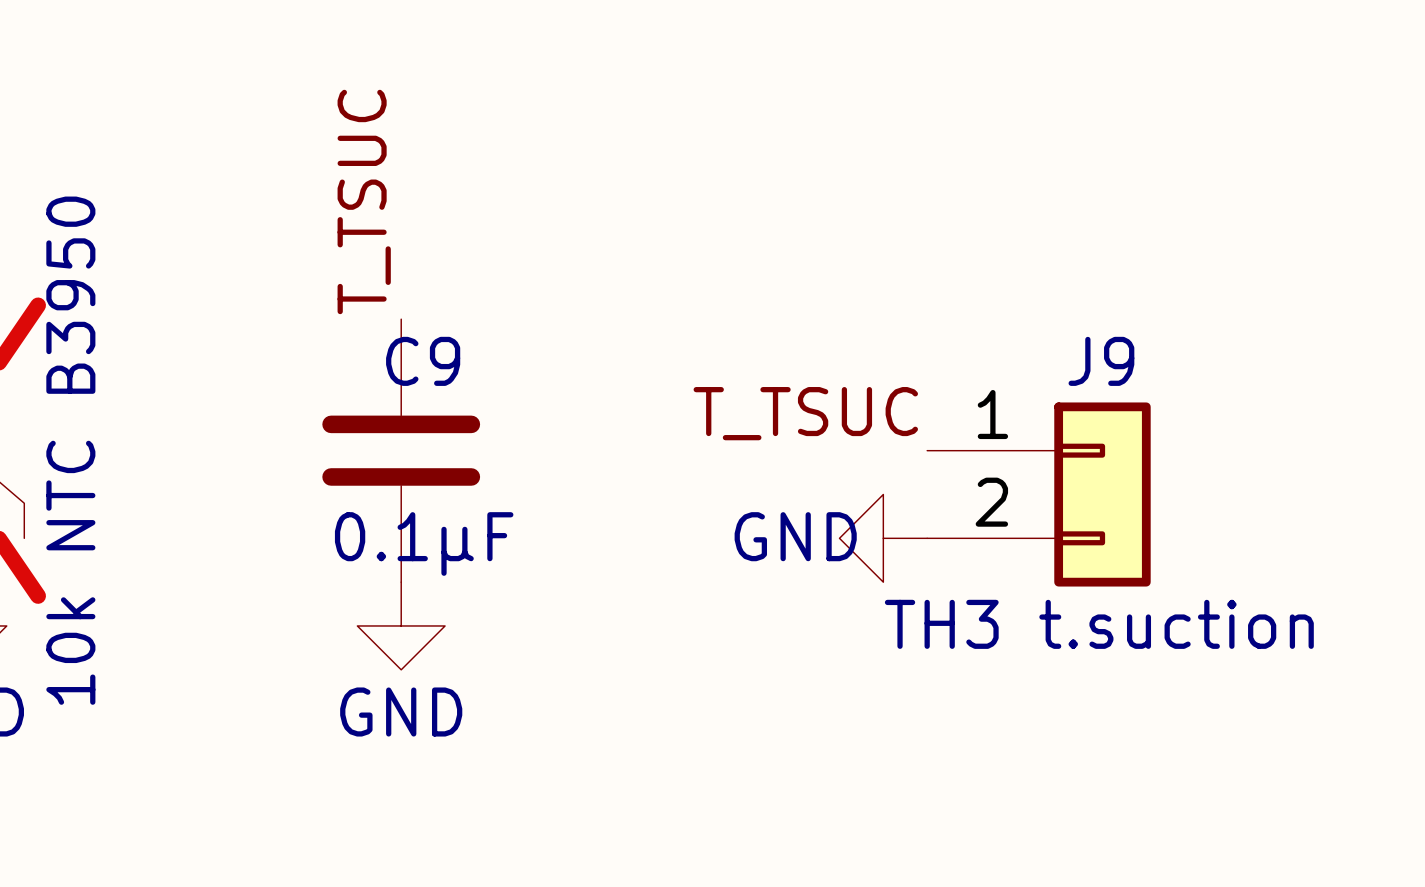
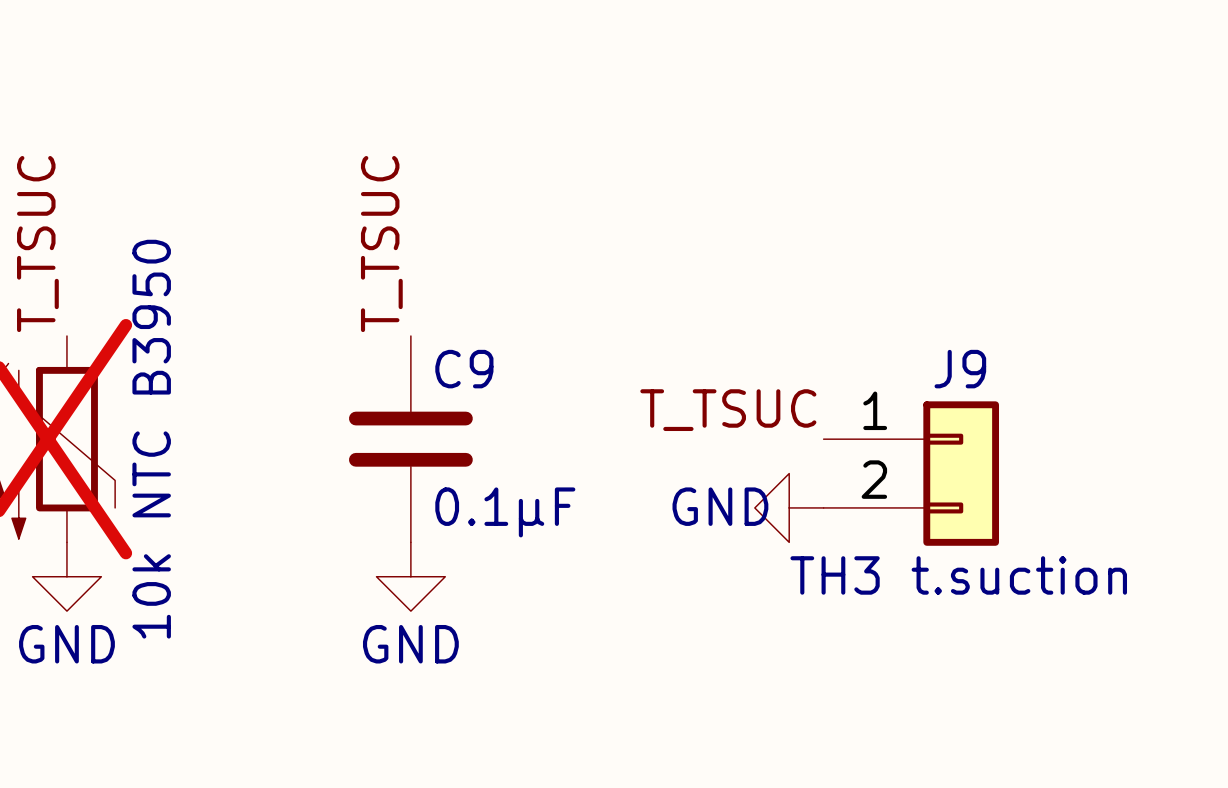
C9 name position: C9 (423, 361) -> C9 (464, 369)
C9 value position: 0.1µF (424, 543) -> 0.1µF (505, 512)

